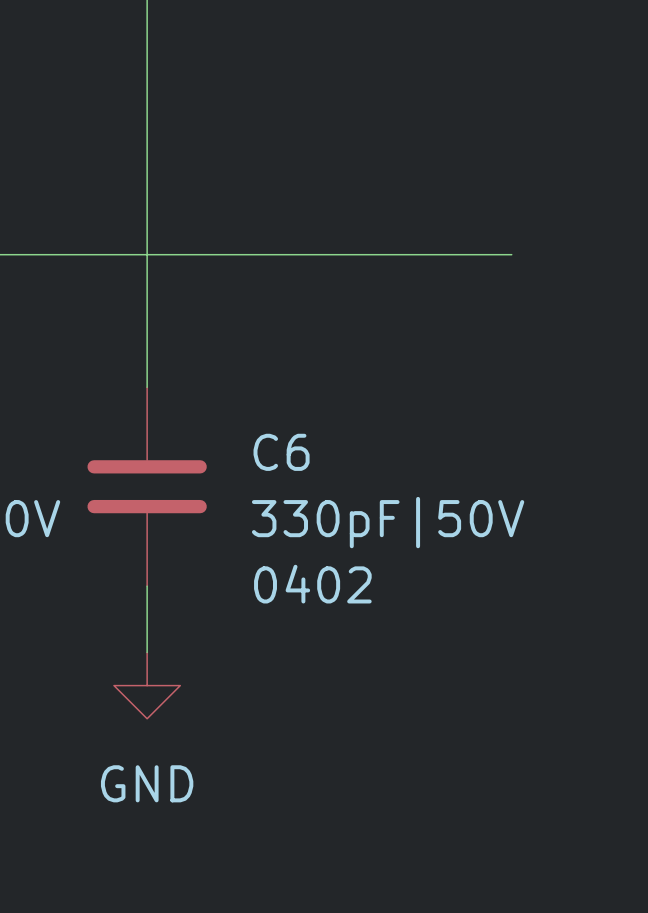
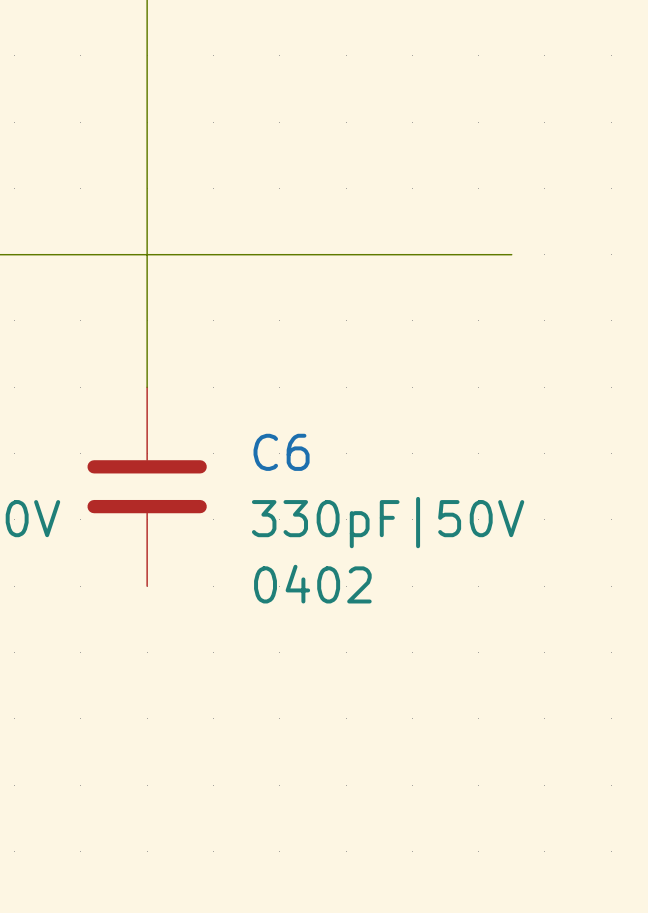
wire: (147, 586) (147, 652) -> none
power symbol: GND (147, 685) -> none

